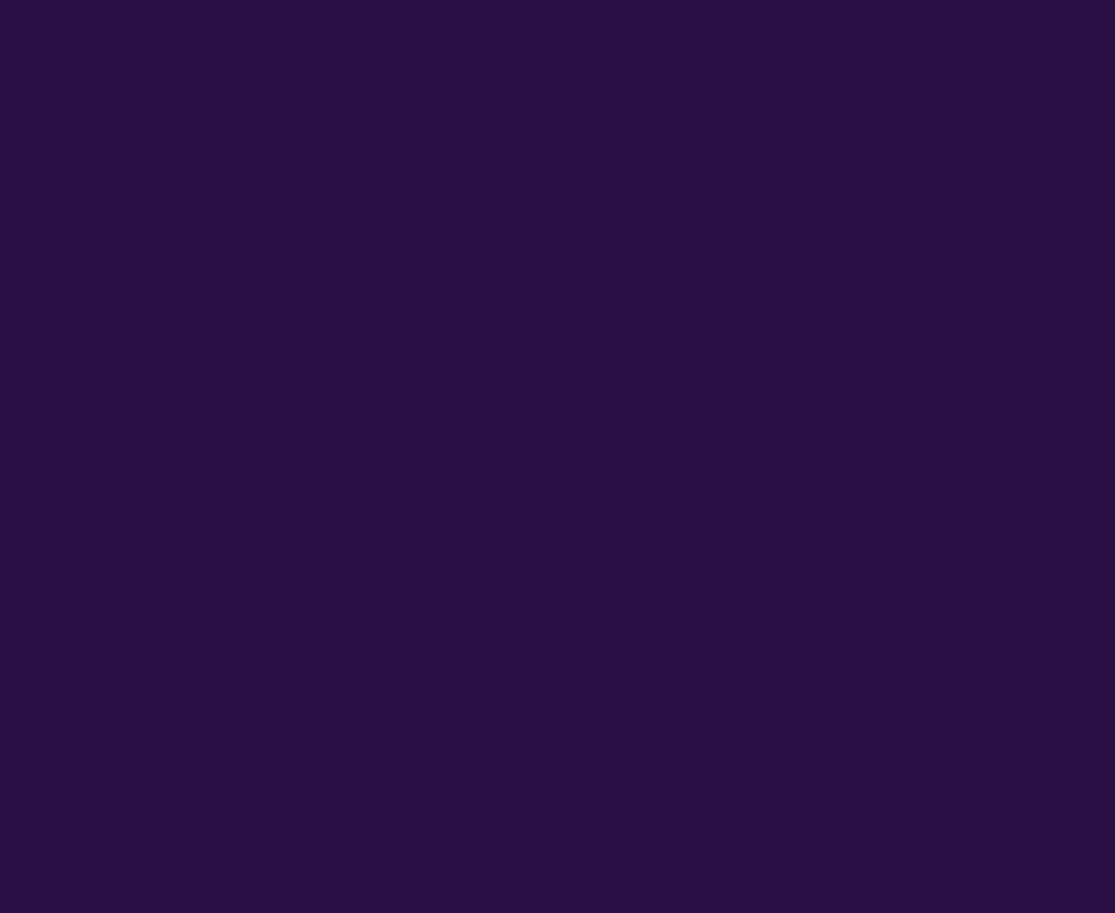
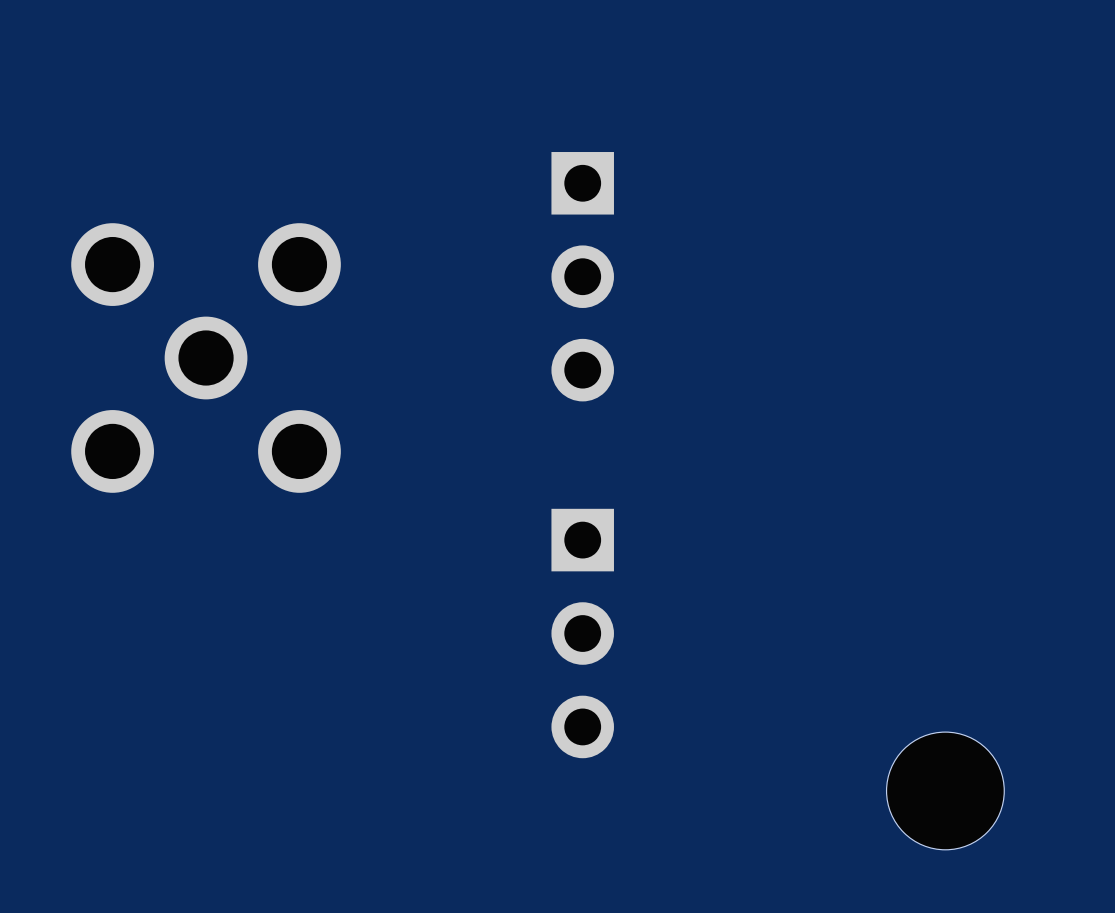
part: none -> (582, 276)
part: none -> (206, 358)
part: none -> (582, 633)
part: none -> (945, 790)

